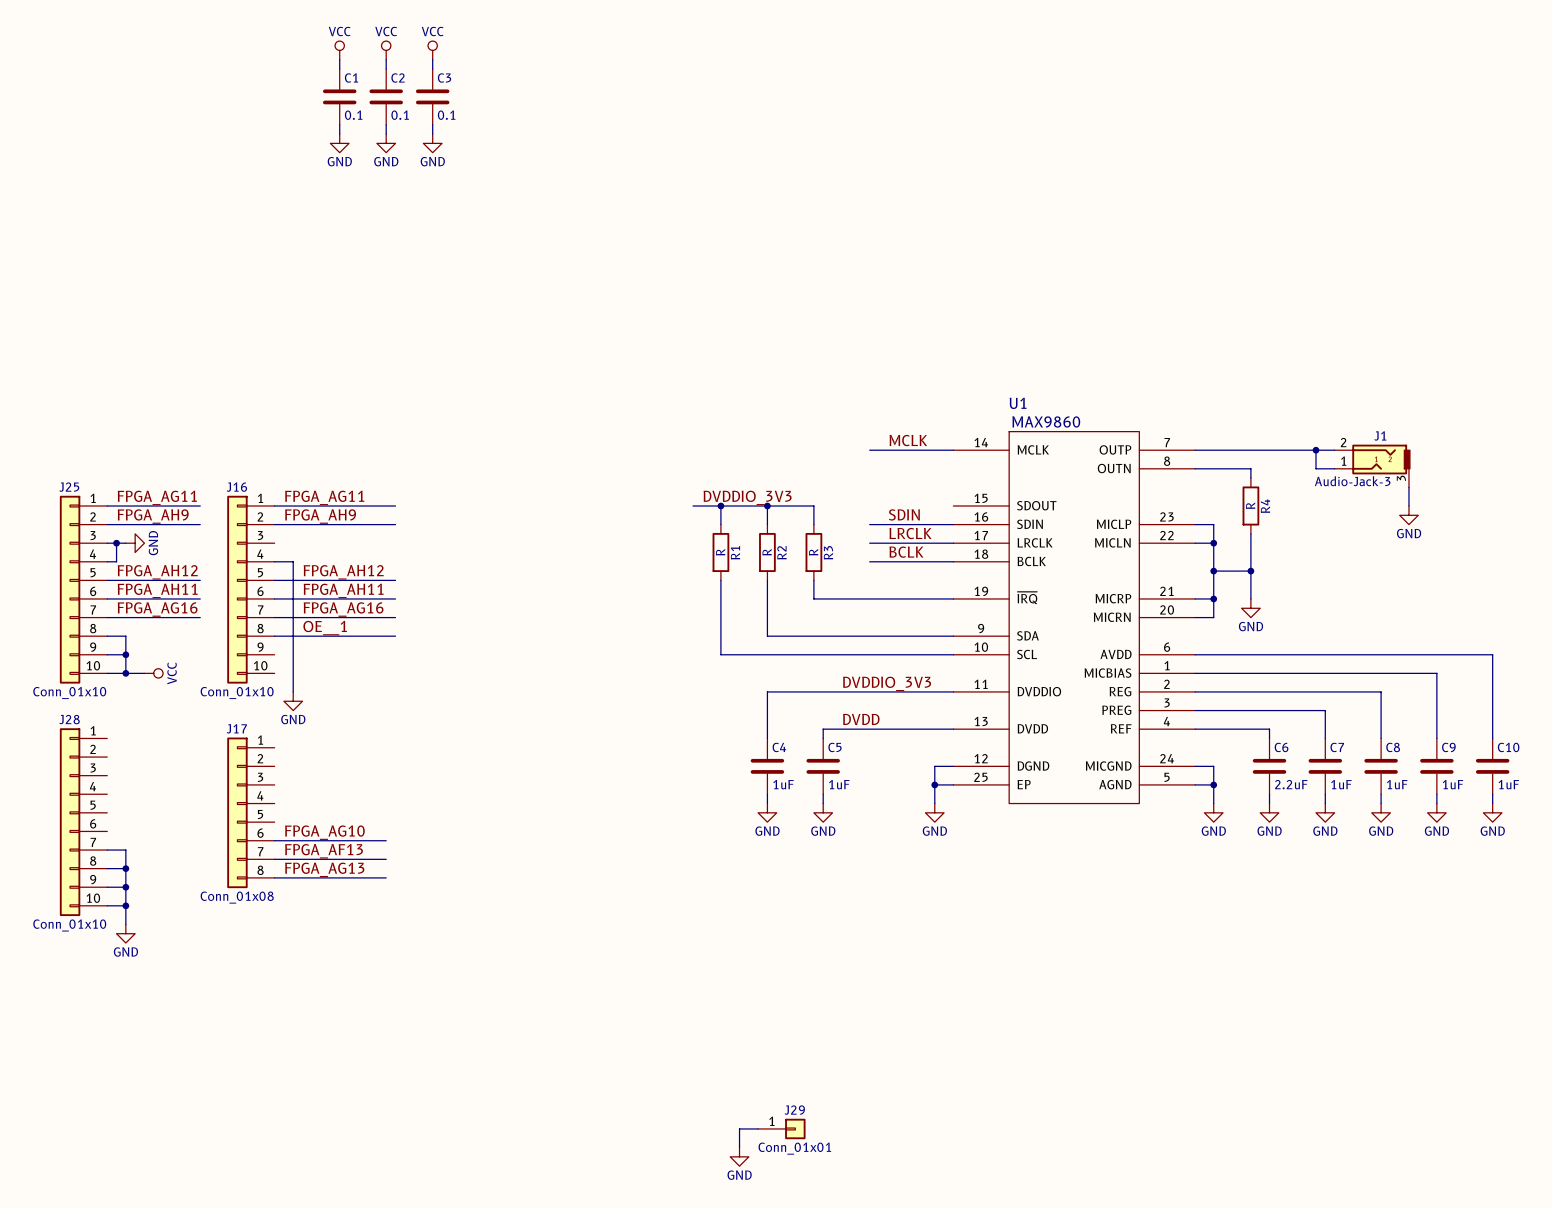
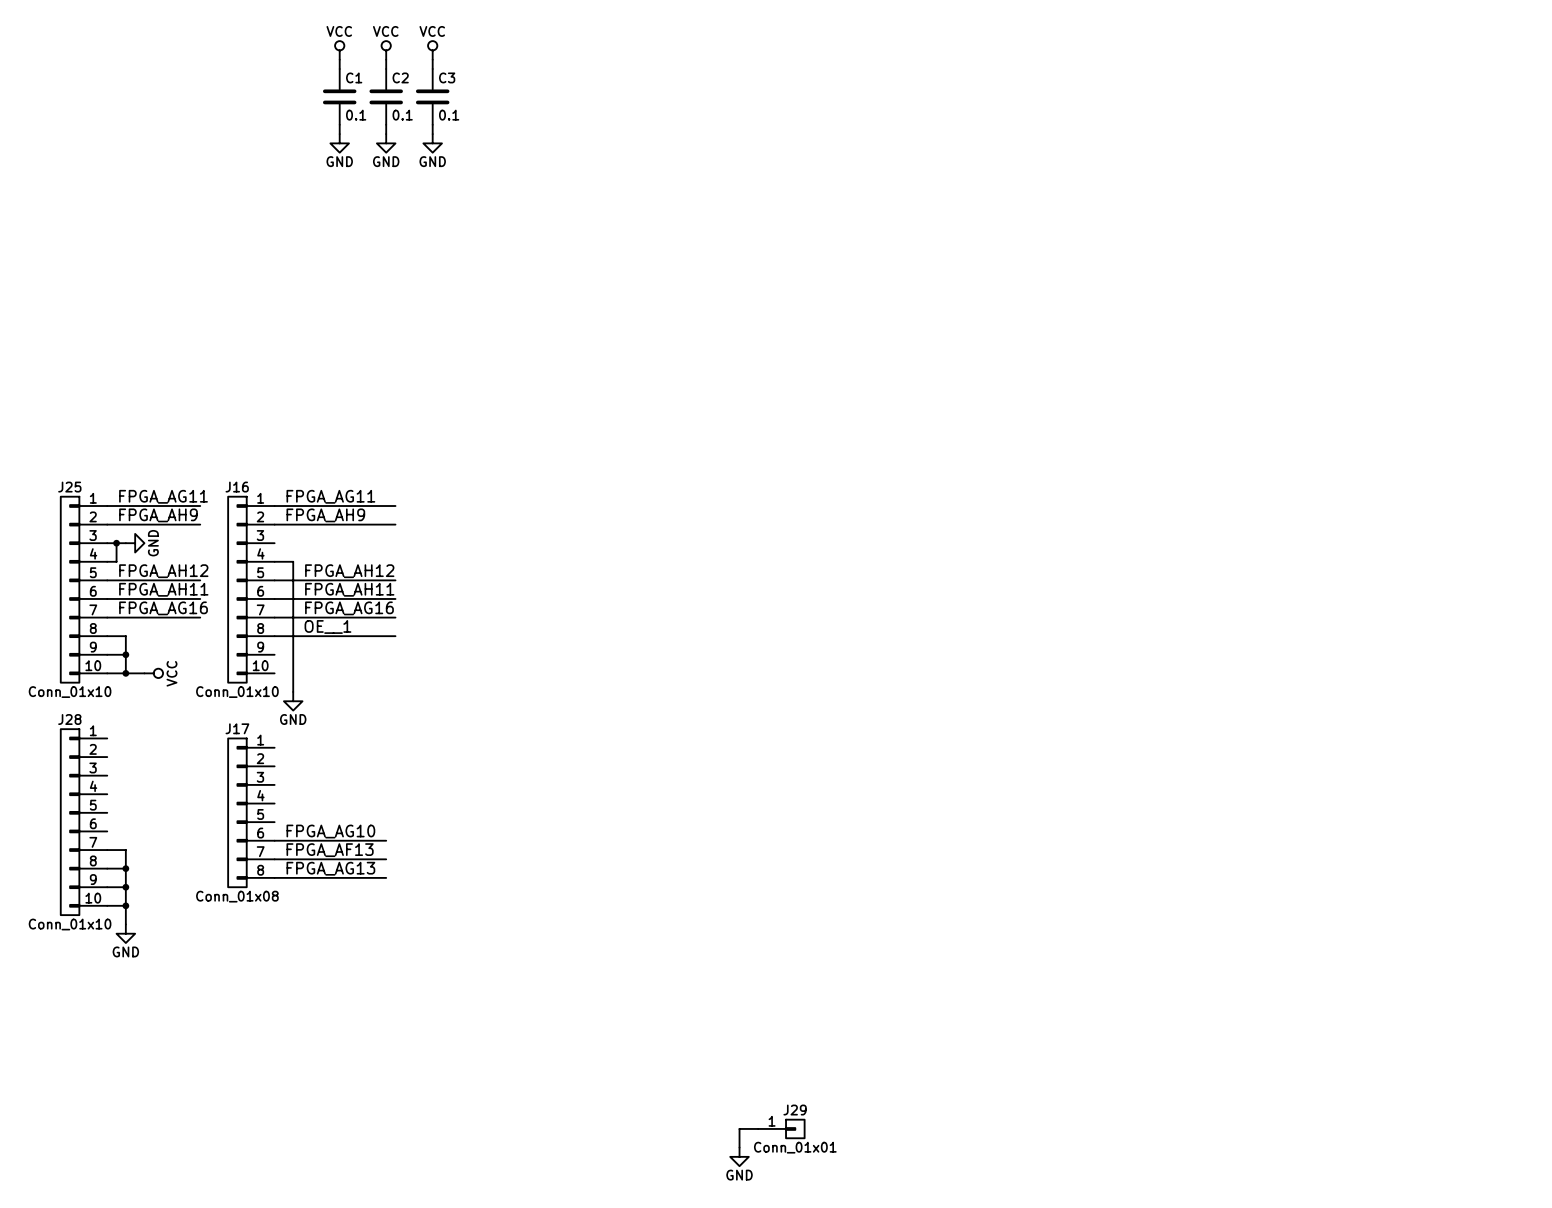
label: MCLK (908, 440) -> none
wire: (869, 450) (953, 450) -> none
wire: (1195, 450) (1334, 450) -> none
wire: (1316, 450) (1316, 468) (1334, 468) -> none
junction: (1316, 450) -> none
J1: Audio-Jack-3 (1372, 466) -> none
wire: (1195, 468) (1250, 468) (1250, 478) -> none
wire: (1408, 487) (1408, 506) -> none
label: DVDDIO_3V3 (747, 497) -> none
wire: (693, 506) (813, 506) (813, 524) -> none
wire: (720, 506) (720, 524) -> none
junction: (720, 506) -> none
wire: (767, 506) (767, 524) -> none
junction: (767, 506) -> none
R4: R (1250, 506) -> none
label: SDIN (904, 514) -> none
power symbol: GND (1408, 515) -> none
wire: (869, 524) (953, 524) -> none
wire: (1195, 524) (1213, 524) (1213, 617) (1195, 617) -> none
label: LRCLK (910, 533) -> none
wire: (1250, 533) (1250, 598) -> none
wire: (869, 543) (953, 543) -> none
wire: (1195, 543) (1213, 543) -> none
junction: (1213, 543) -> none
R1: R (720, 552) -> none
R2: R (767, 552) -> none
R3: R (813, 552) -> none
label: BCLK (906, 552) -> none
wire: (869, 561) (953, 561) -> none
wire: (1213, 571) (1250, 571) -> none
junction: (1213, 571) -> none
junction: (1250, 571) -> none
wire: (720, 580) (720, 654) (953, 654) -> none
wire: (767, 580) (767, 636) (953, 636) -> none
wire: (813, 580) (813, 598) (953, 598) -> none
wire: (1195, 598) (1213, 598) -> none
junction: (1213, 598) -> none
power symbol: GND (1250, 608) -> none
U1: MAX9860 (1074, 617) -> none
wire: (1195, 654) (1492, 654) (1492, 738) -> none
wire: (1195, 673) (1436, 673) (1436, 738) -> none
label: DVDDIO_3V3 (887, 683) -> none
wire: (953, 691) (767, 691) (767, 738) -> none
wire: (1195, 691) (1381, 691) (1381, 738) -> none
wire: (1195, 710) (1325, 710) (1325, 738) -> none
label: DVDD (861, 719) -> none
wire: (953, 729) (823, 729) (823, 738) -> none
wire: (1195, 729) (1269, 729) (1269, 738) -> none
C4: 1uF (767, 766) -> none
C5: 1uF (823, 766) -> none
wire: (953, 766) (934, 766) (934, 803) -> none
wire: (1195, 766) (1213, 766) (1213, 803) -> none
C6: 2.2uF (1269, 766) -> none
C7: 1uF (1325, 766) -> none
C8: 1uF (1381, 766) -> none
C9: 1uF (1436, 766) -> none
C10: 1uF (1492, 766) -> none
wire: (934, 784) (953, 784) -> none
junction: (934, 784) -> none
wire: (1195, 784) (1213, 784) -> none
junction: (1213, 784) -> none
wire: (767, 794) (767, 803) -> none
wire: (823, 794) (823, 803) -> none
wire: (1269, 794) (1269, 803) -> none
wire: (1325, 794) (1325, 803) -> none
wire: (1381, 794) (1381, 803) -> none
wire: (1436, 794) (1436, 803) -> none
wire: (1492, 794) (1492, 803) -> none
power symbol: GND (767, 812) -> none
power symbol: GND (823, 812) -> none
power symbol: GND (934, 812) -> none
power symbol: GND (1213, 812) -> none
power symbol: GND (1269, 812) -> none
power symbol: GND (1325, 812) -> none
power symbol: GND (1381, 812) -> none
power symbol: GND (1436, 812) -> none
power symbol: GND (1492, 812) -> none

